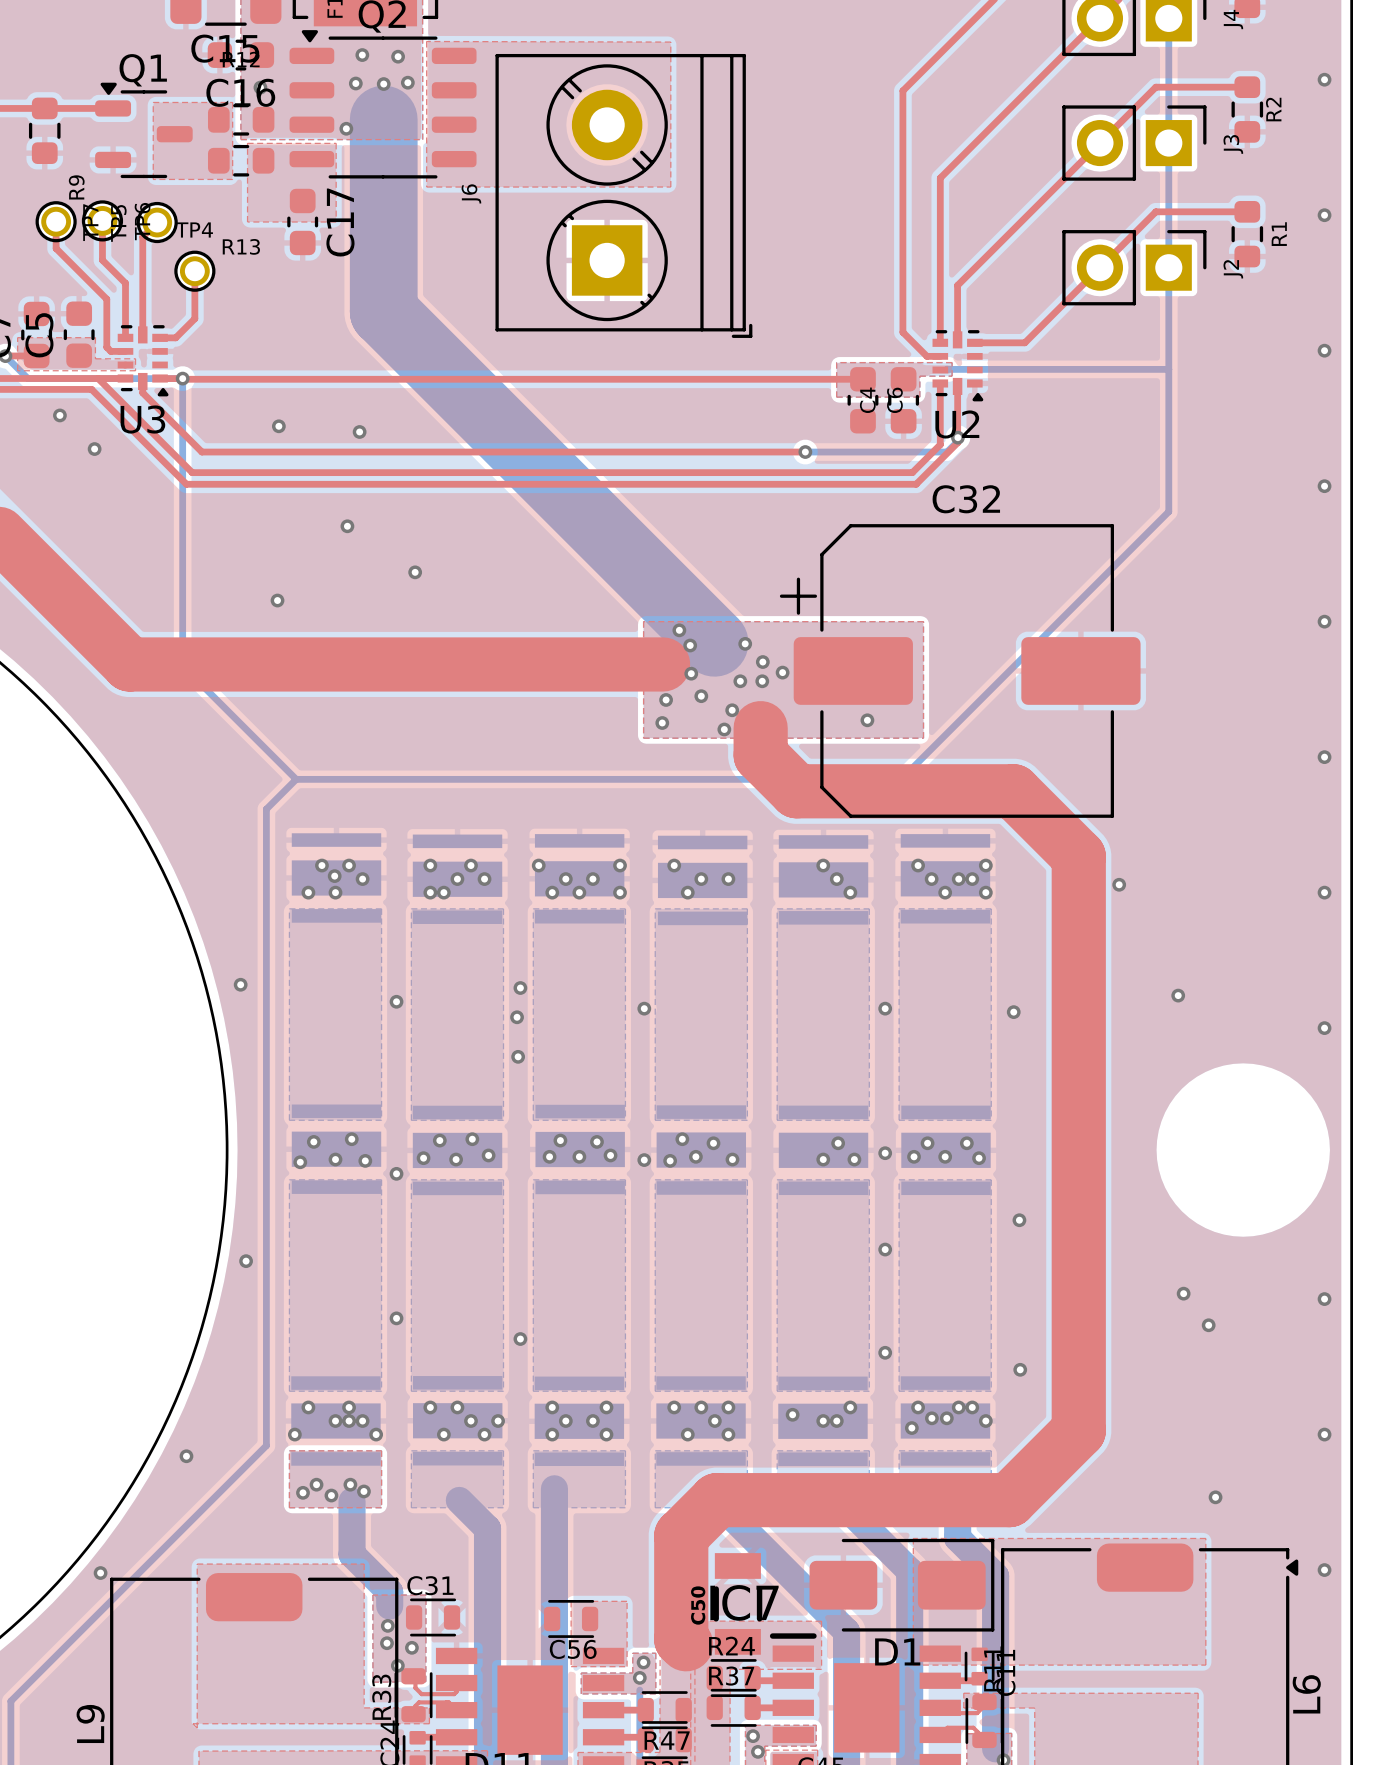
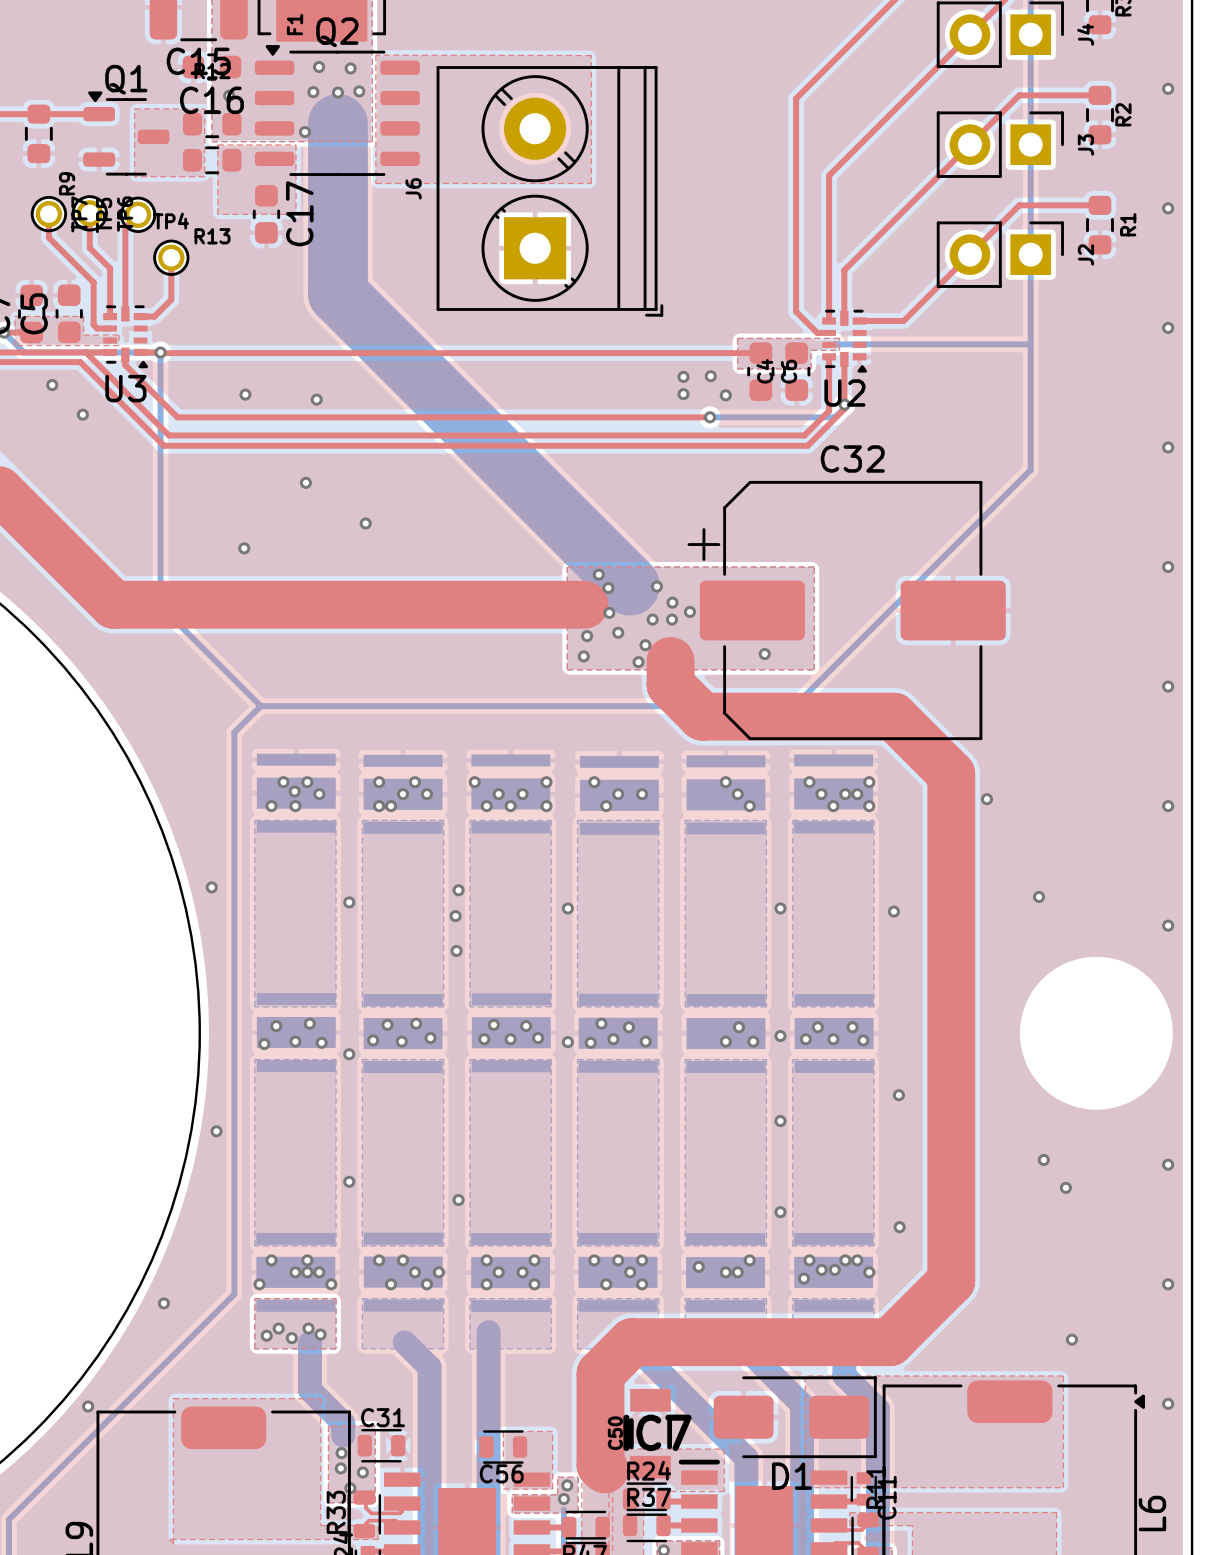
via: none -> (710, 376)
via: none -> (683, 376)
via: none -> (683, 394)
via: none -> (725, 395)

